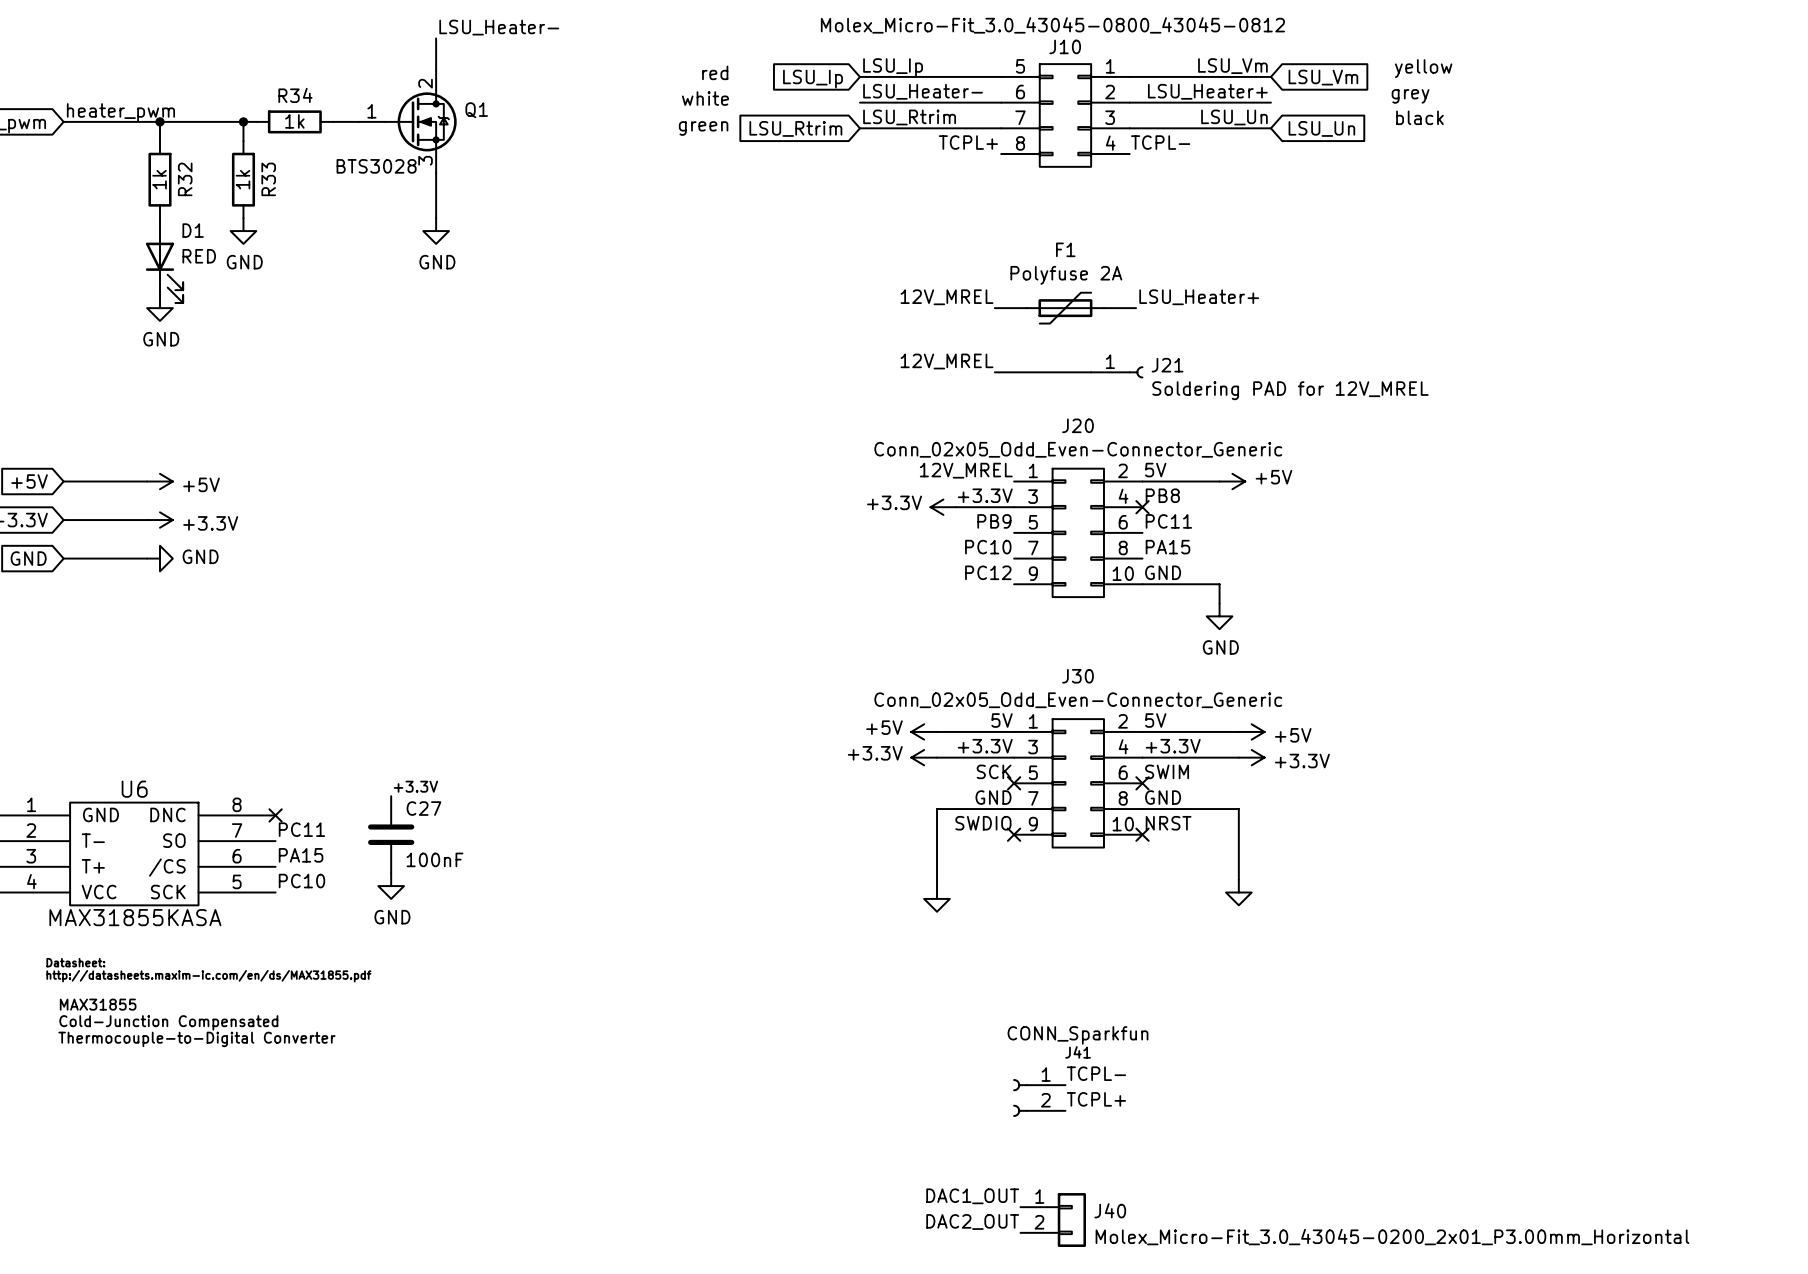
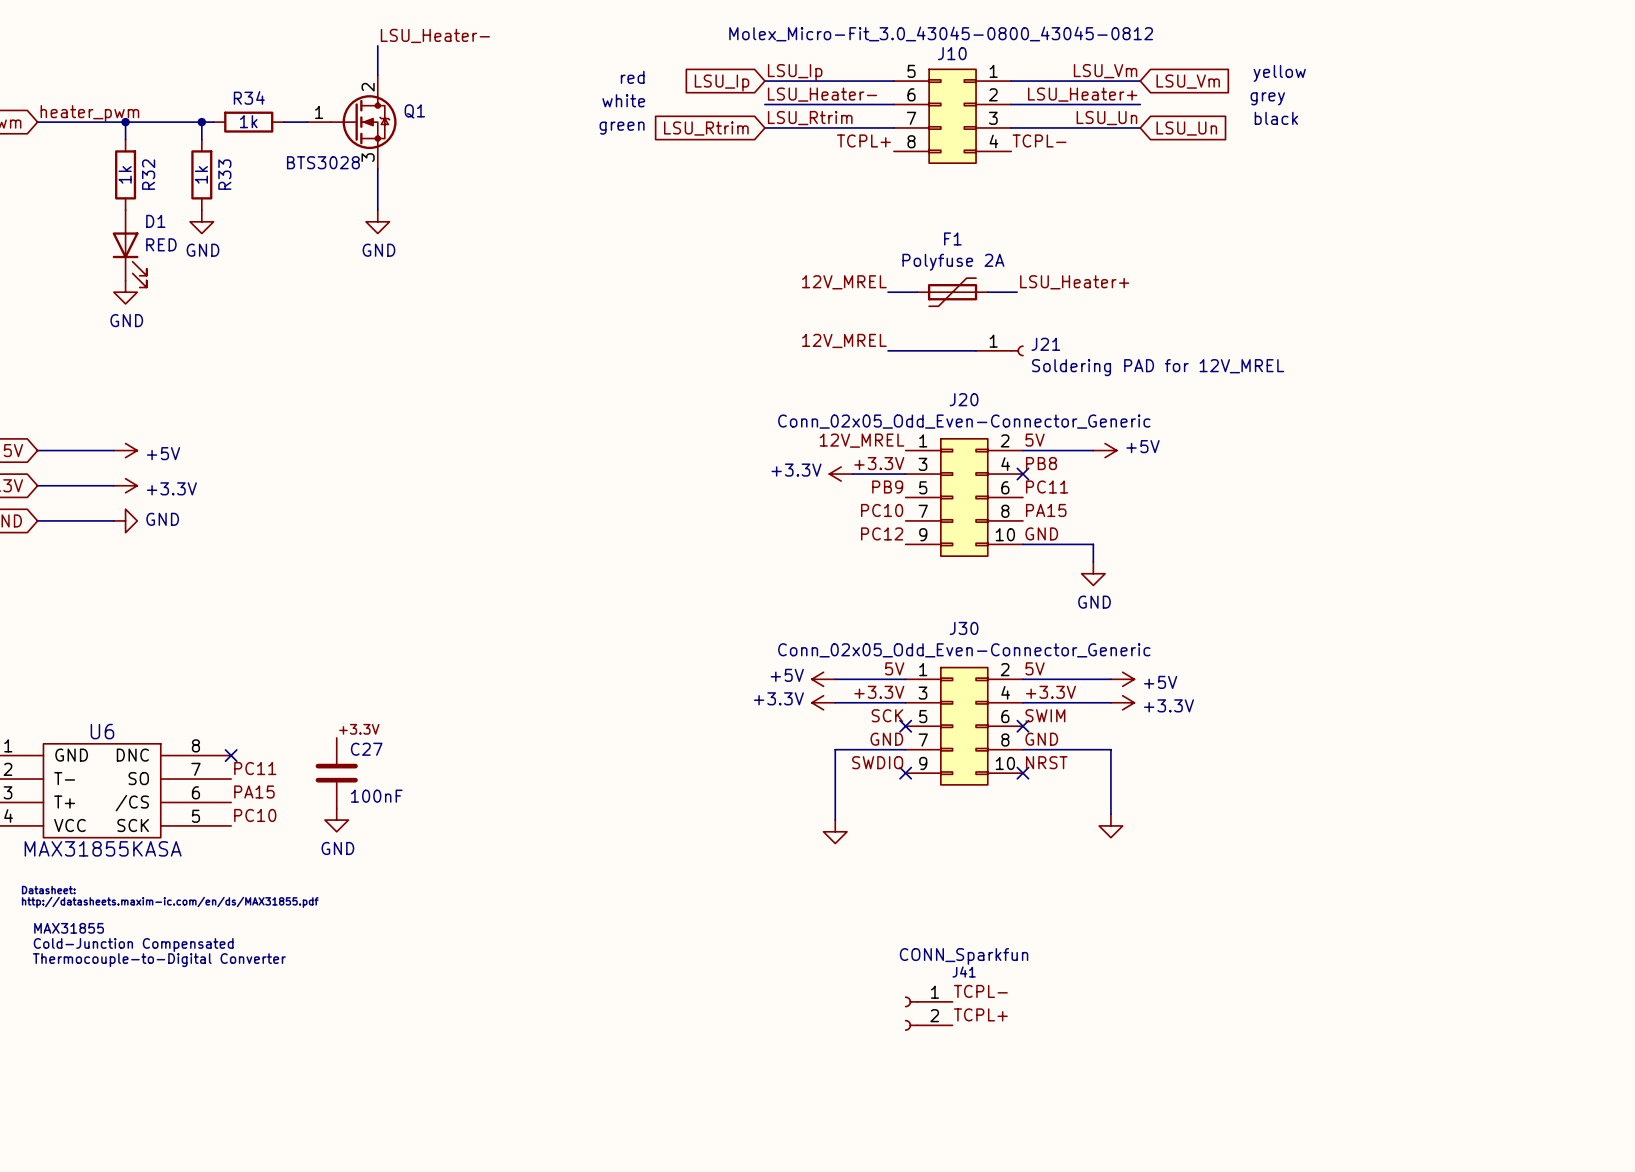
label: DAC1_OUT (972, 1196) -> none
J40: Molex_Micro-Fit_3.0_43045-0200_2x01_P3.00mm_Horizontal (1053, 1220) -> none
label: DAC2_OUT (972, 1222) -> none

